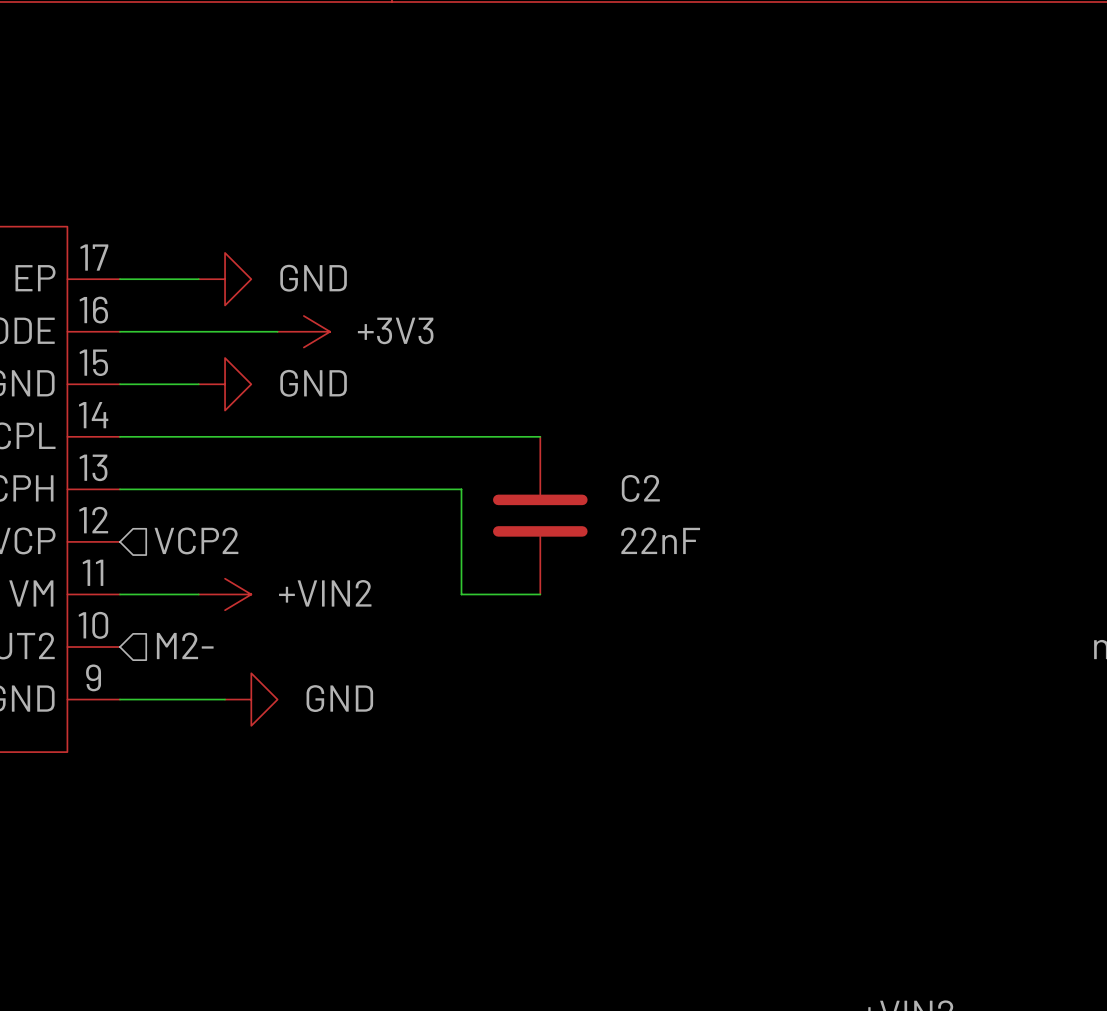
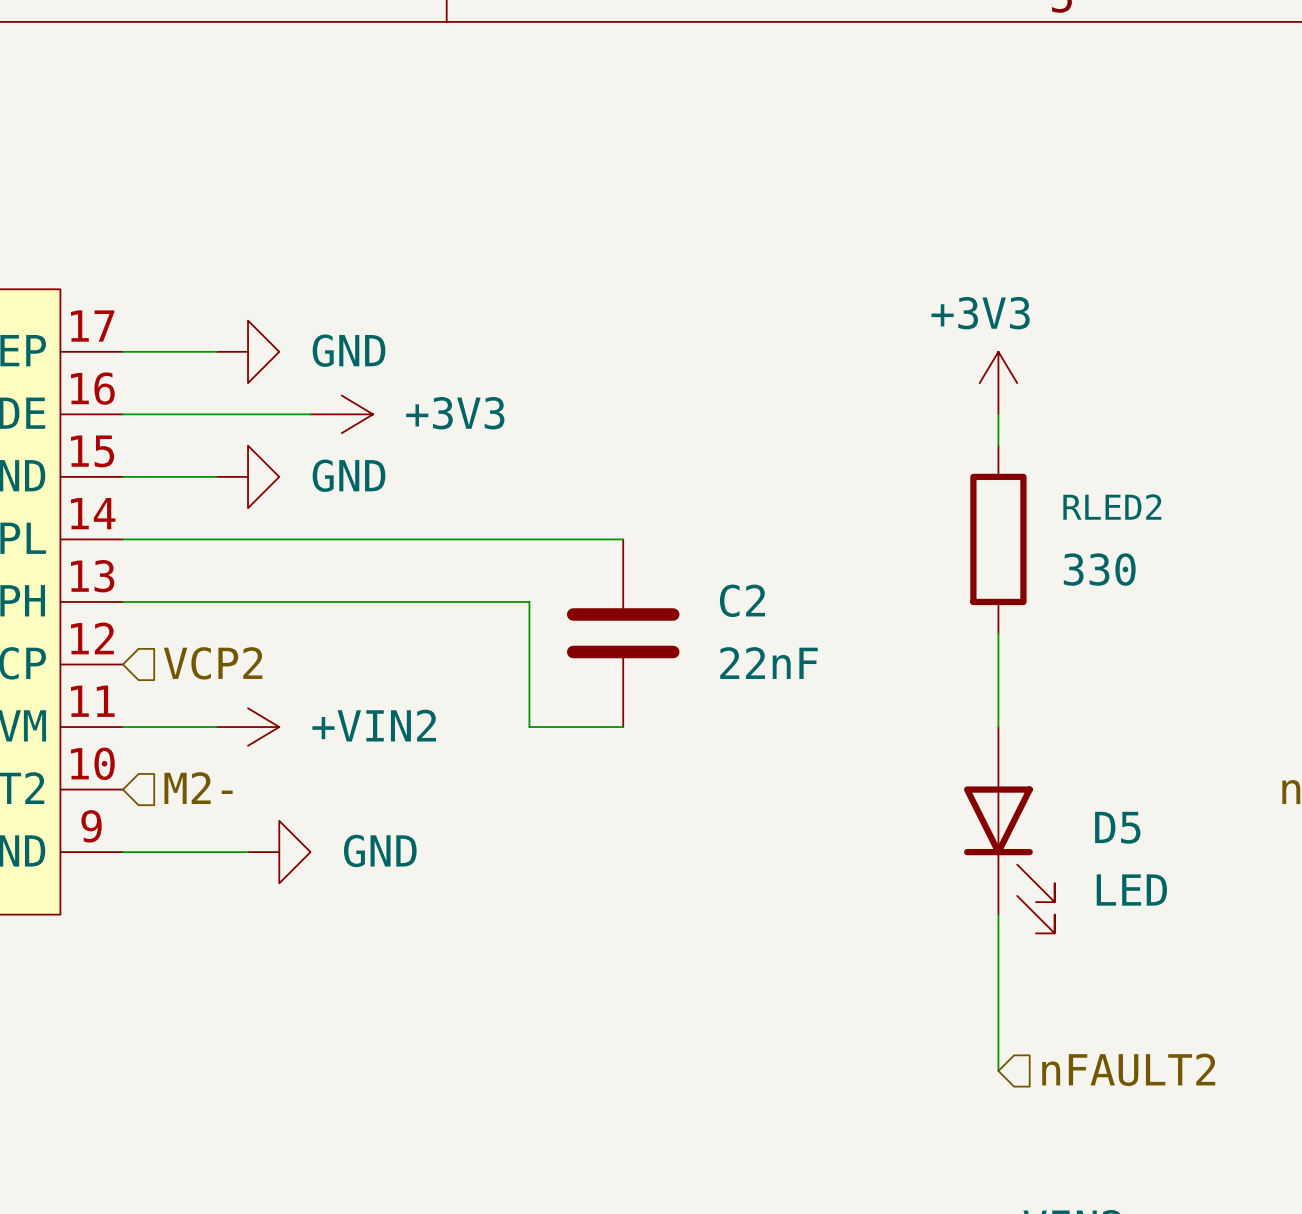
power symbol: none -> +3V3 (998, 383)
wire: none -> (998, 414) (998, 445)
RLED2: none -> 330 (998, 539)
wire: none -> (998, 633) (998, 727)
D5: none -> LED (1009, 830)
wire: none -> (998, 914) (998, 1070)
hierarchical label: none -> nFAULT2 (1128, 1069)

